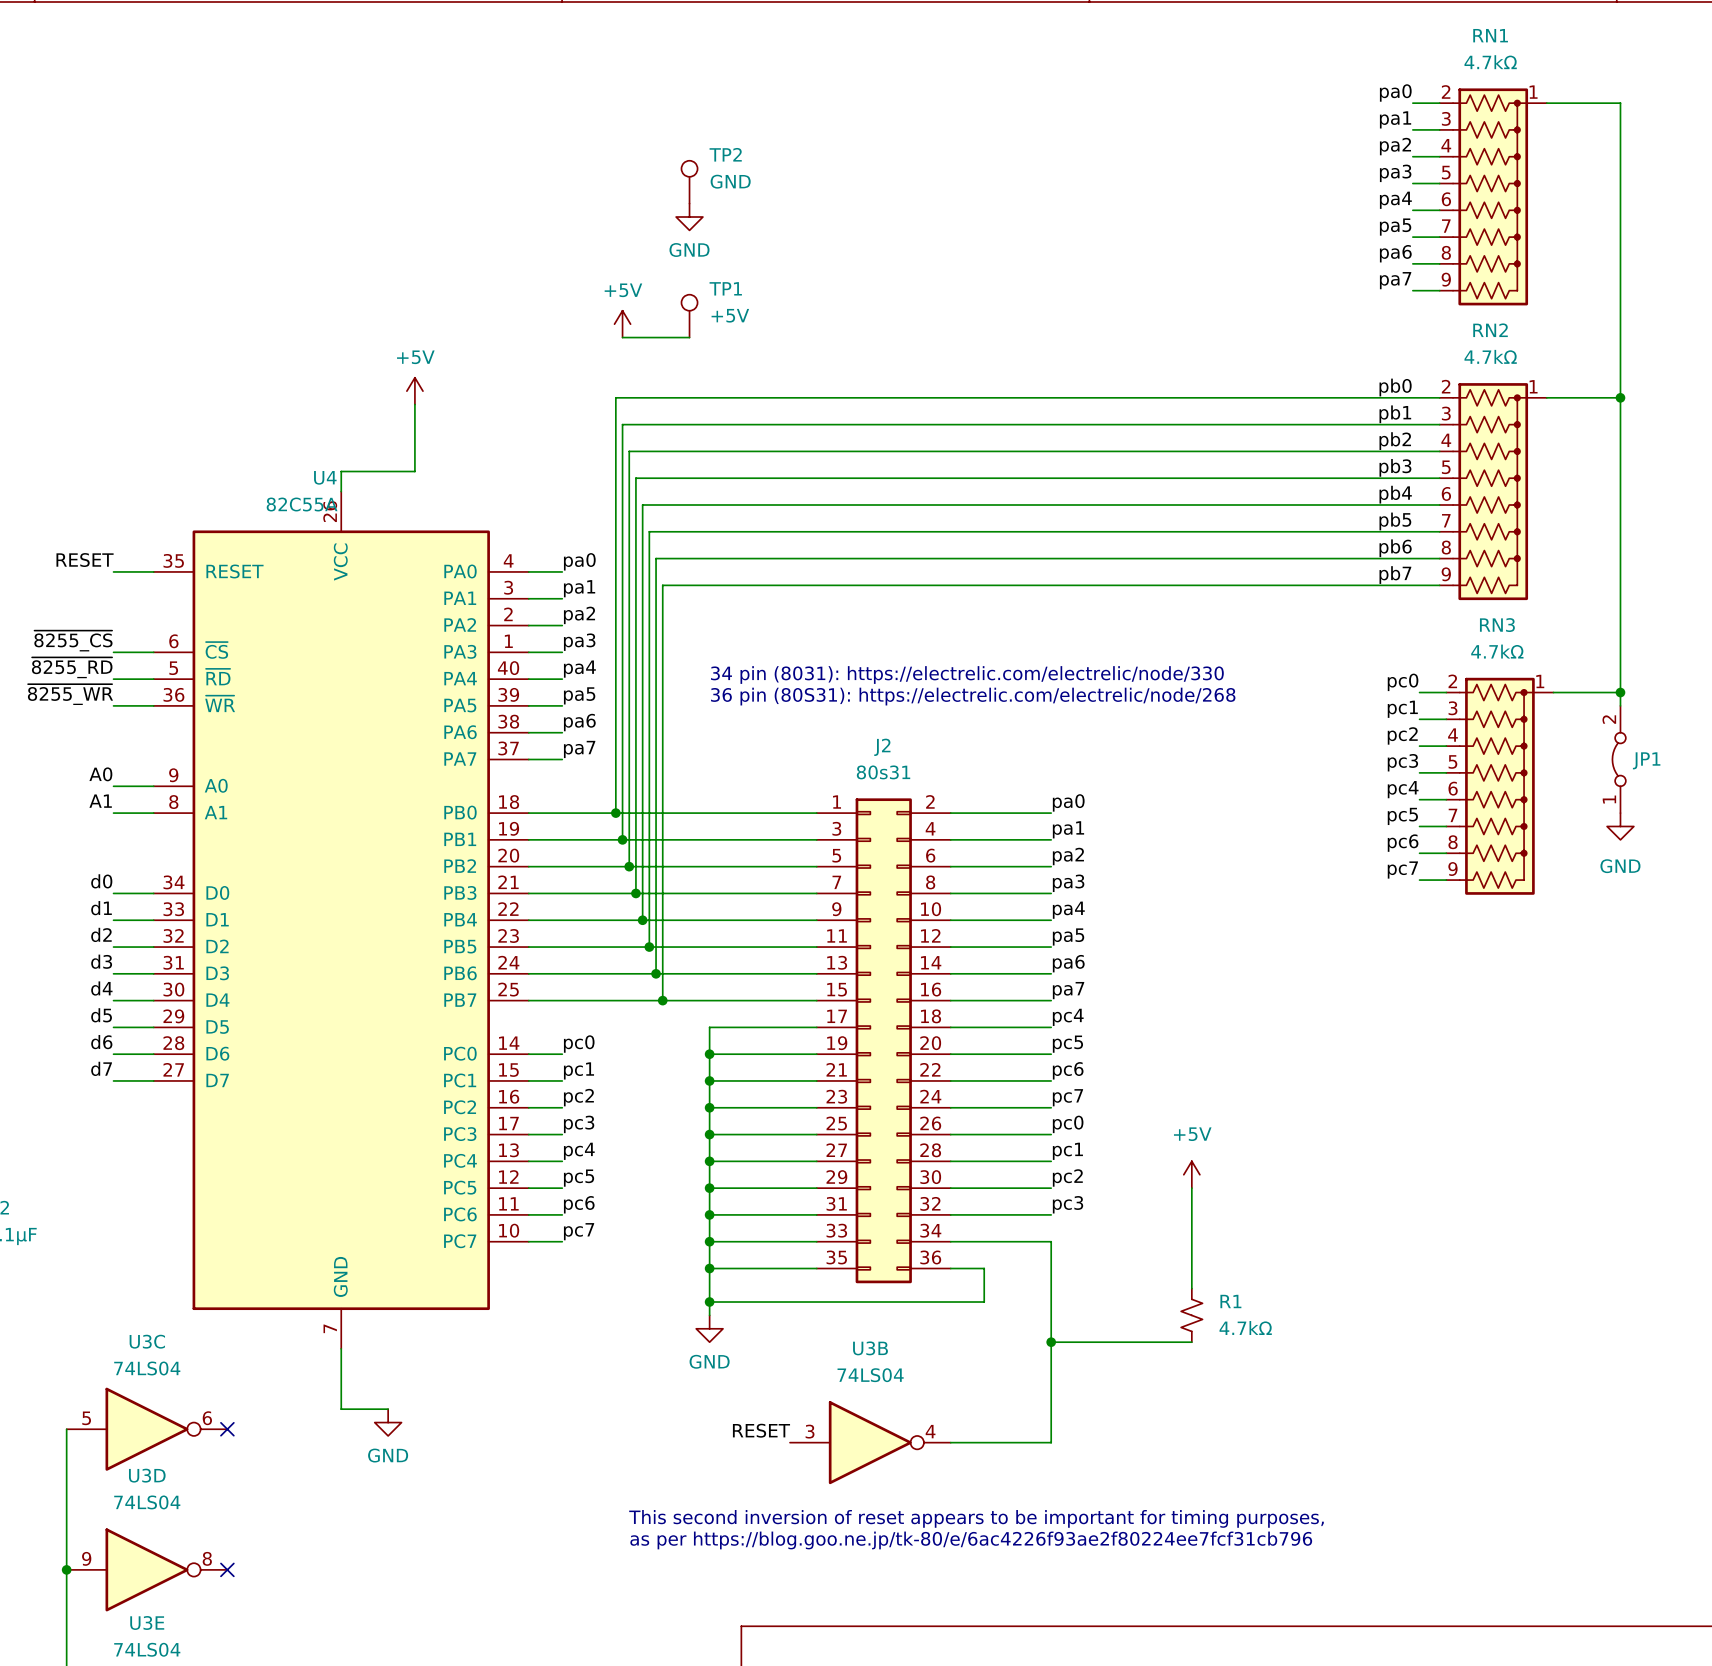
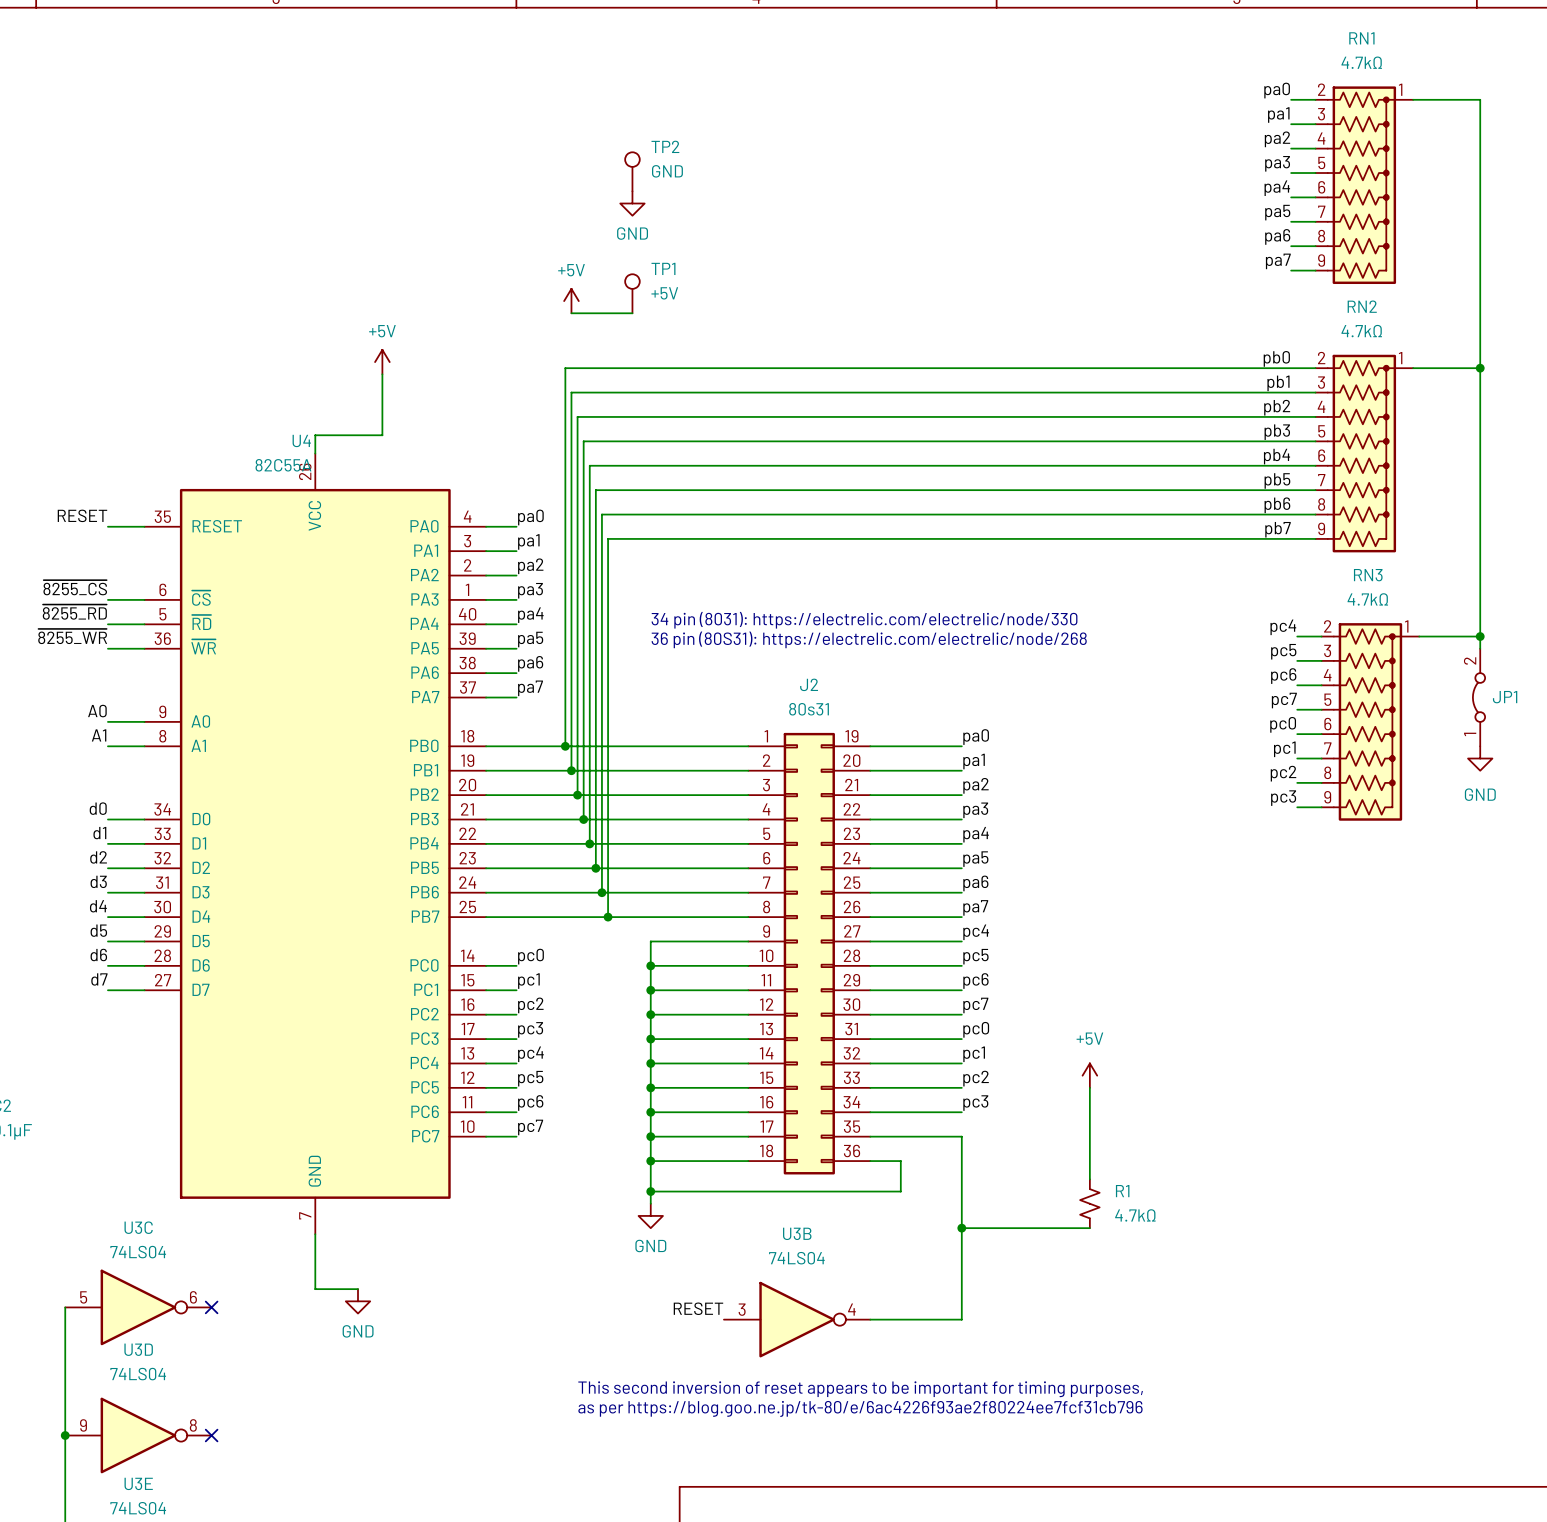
label: pc0 (1403, 682) -> pc4 (1283, 627)
label: pc1 (1402, 709) -> pc5 (1283, 651)
label: pc2 (1402, 735) -> pc6 (1283, 676)
label: pc3 (1402, 762) -> pc7 (1284, 700)
label: pc4 (1403, 789) -> pc0 (1283, 724)
J2 symbol: [816, 798, 951, 1284] -> [748, 732, 871, 1175]
label: pc5 (1402, 816) -> pc1 (1284, 749)
label: pc6 (1403, 843) -> pc2 (1283, 773)
label: pc7 (1402, 870) -> pc3 (1283, 798)

